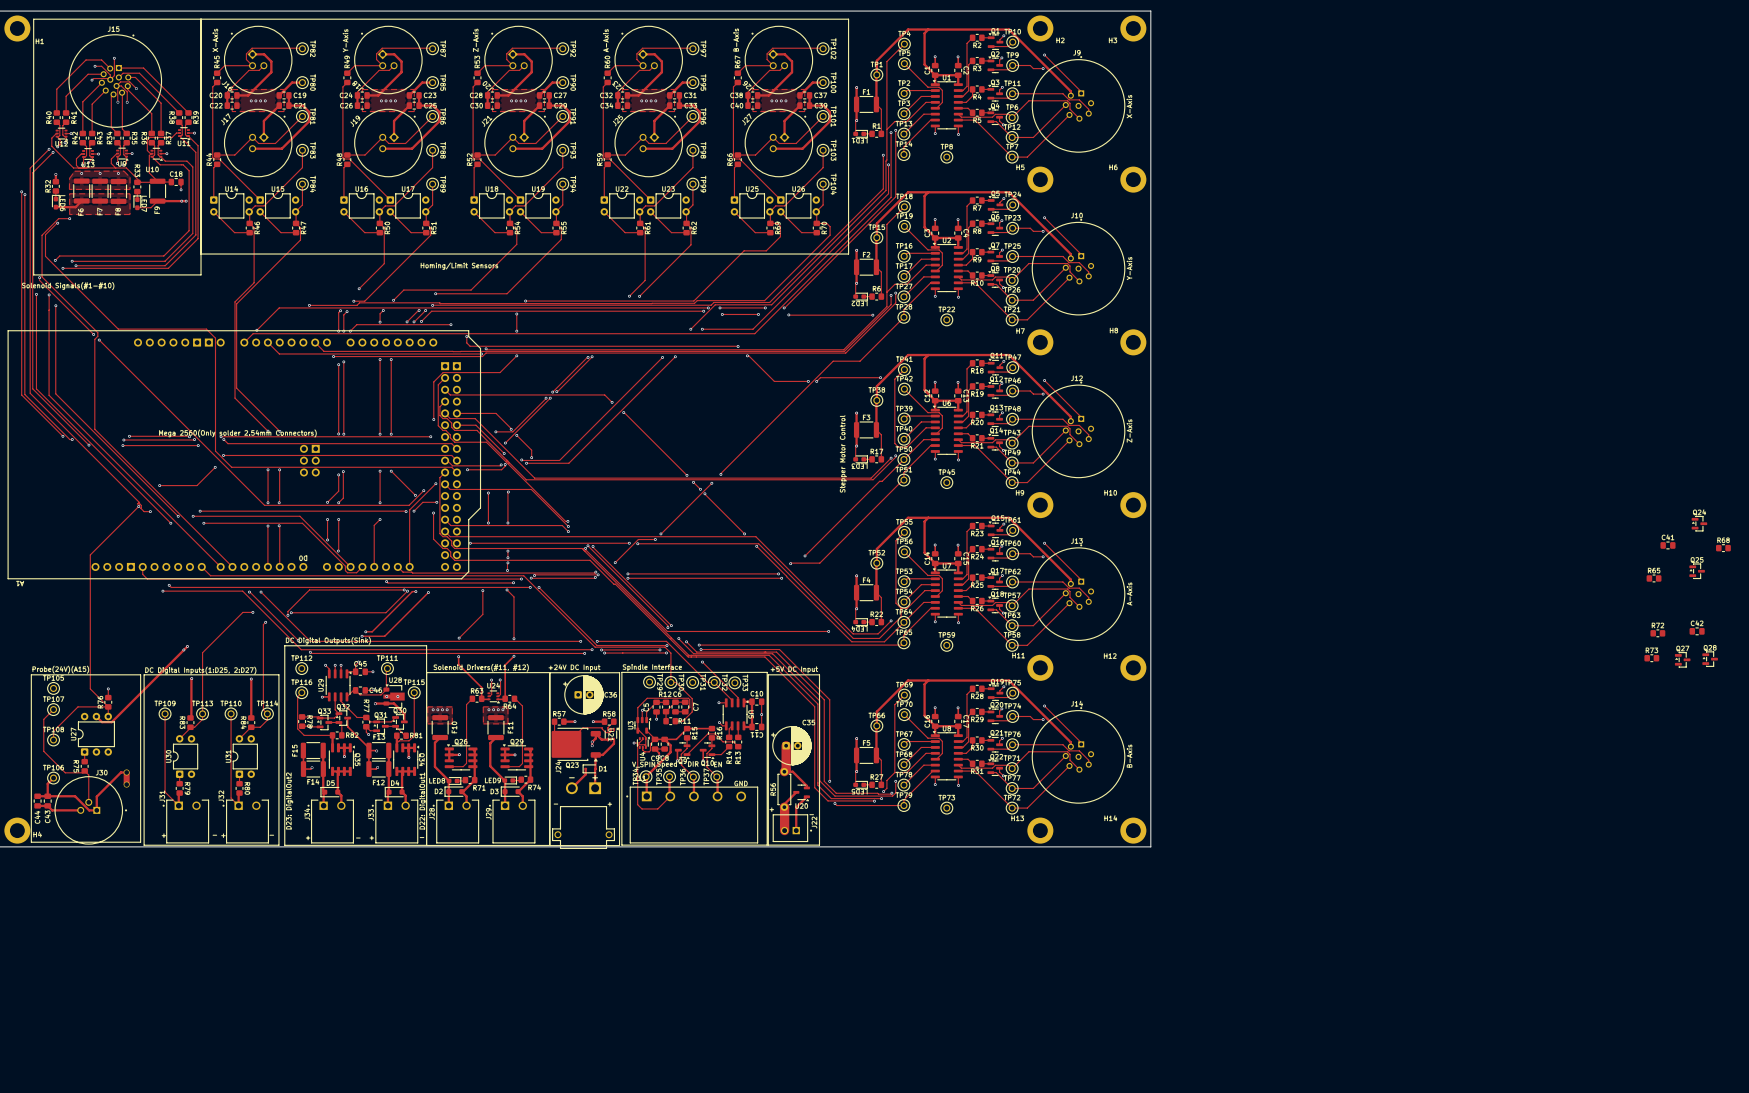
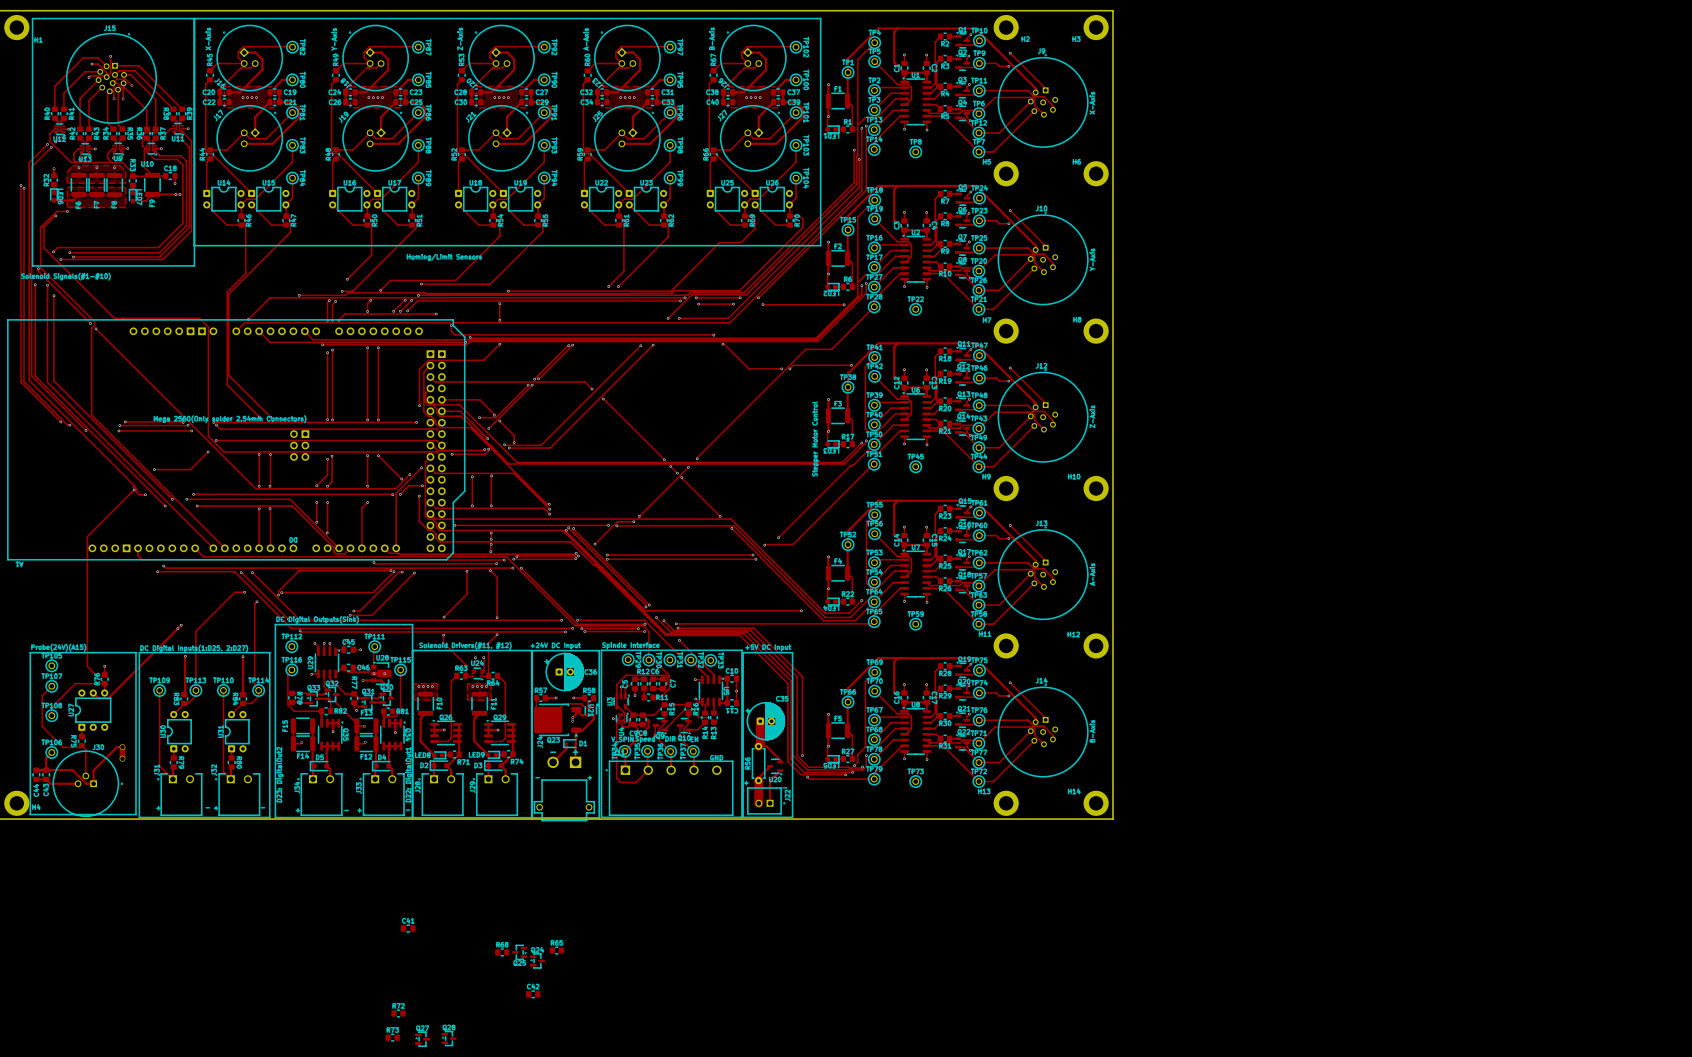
part position: (1699, 523) -> (537, 960)
part position: (1667, 545) -> (408, 928)
part position: (1723, 548) -> (502, 952)
part rotation: 0° (1697, 571) -> 180° (519, 952)
part position: (1697, 571) -> (519, 952)
part position: (1654, 578) -> (556, 950)
part position: (1697, 631) -> (533, 994)
part position: (1657, 633) -> (398, 1013)
part position: (1651, 658) -> (392, 1037)
part position: (1682, 659) -> (422, 1039)
part position: (1710, 659) -> (449, 1038)

